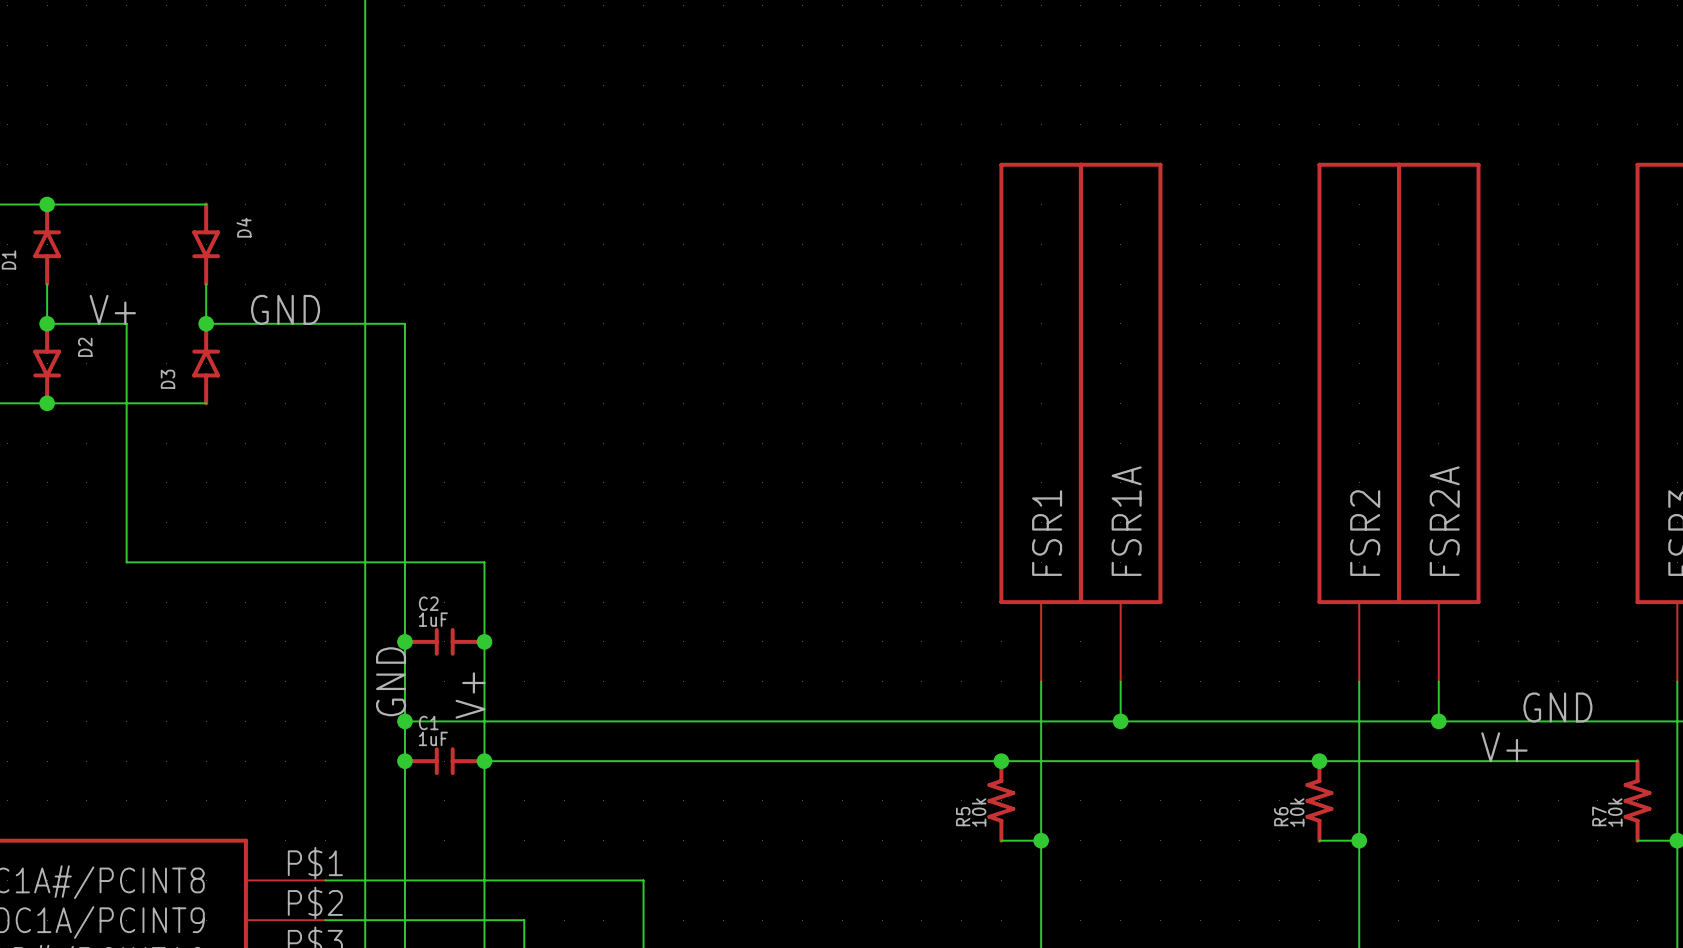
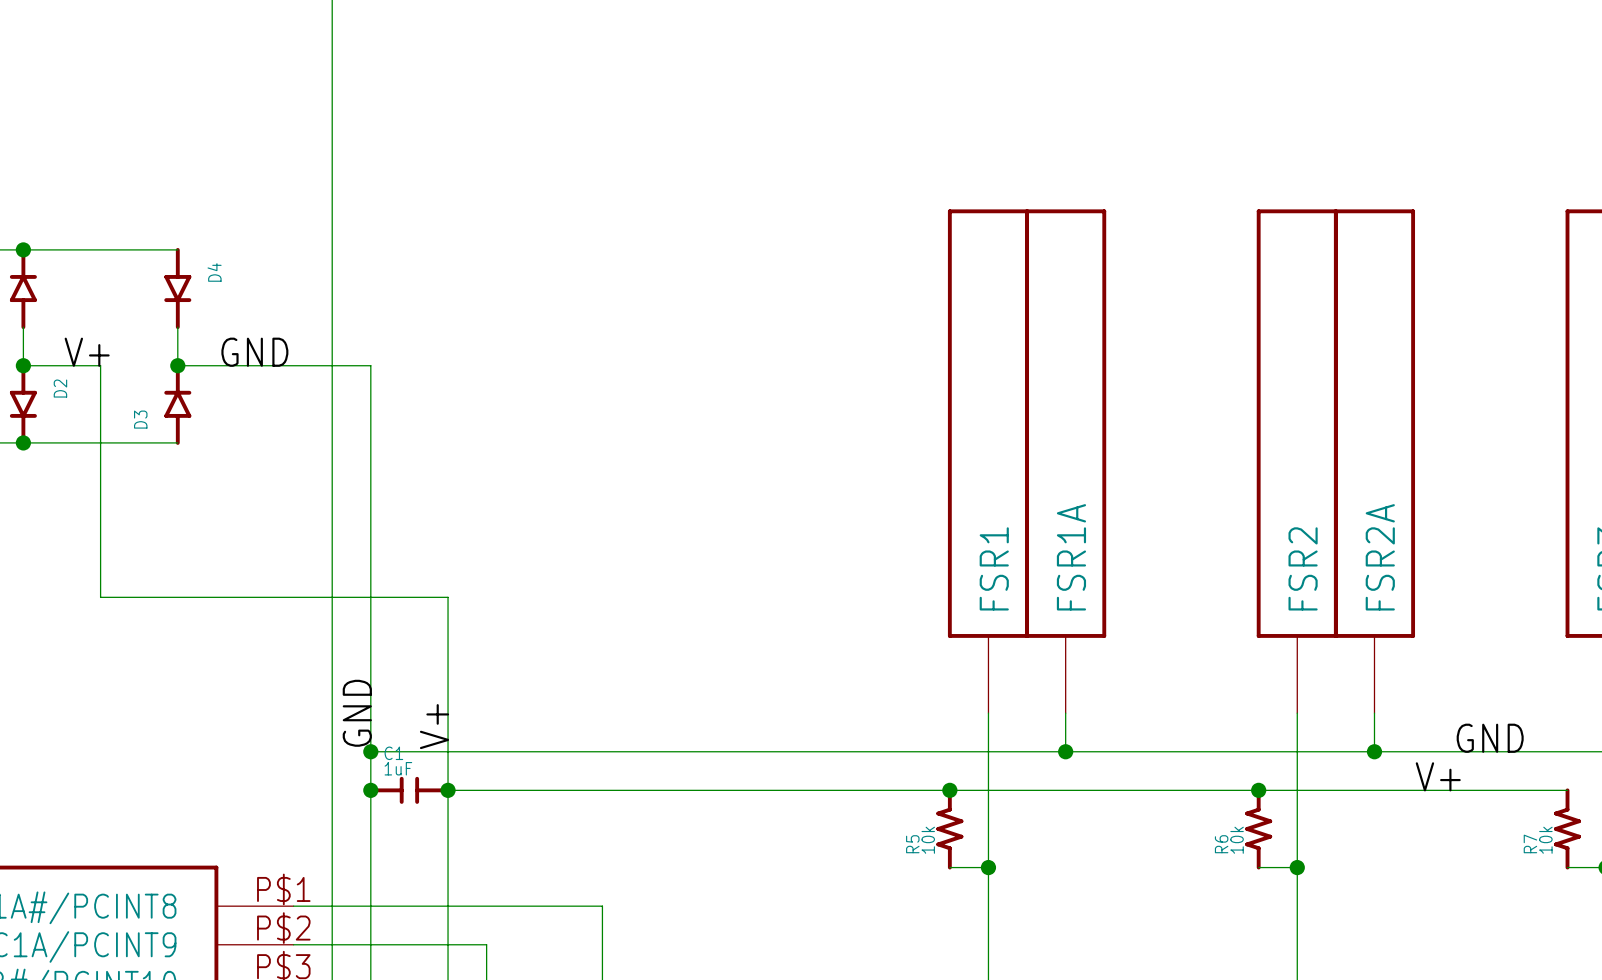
junction: (404, 641) -> none
C2: 1uF (444, 641) -> none
junction: (484, 641) -> none

